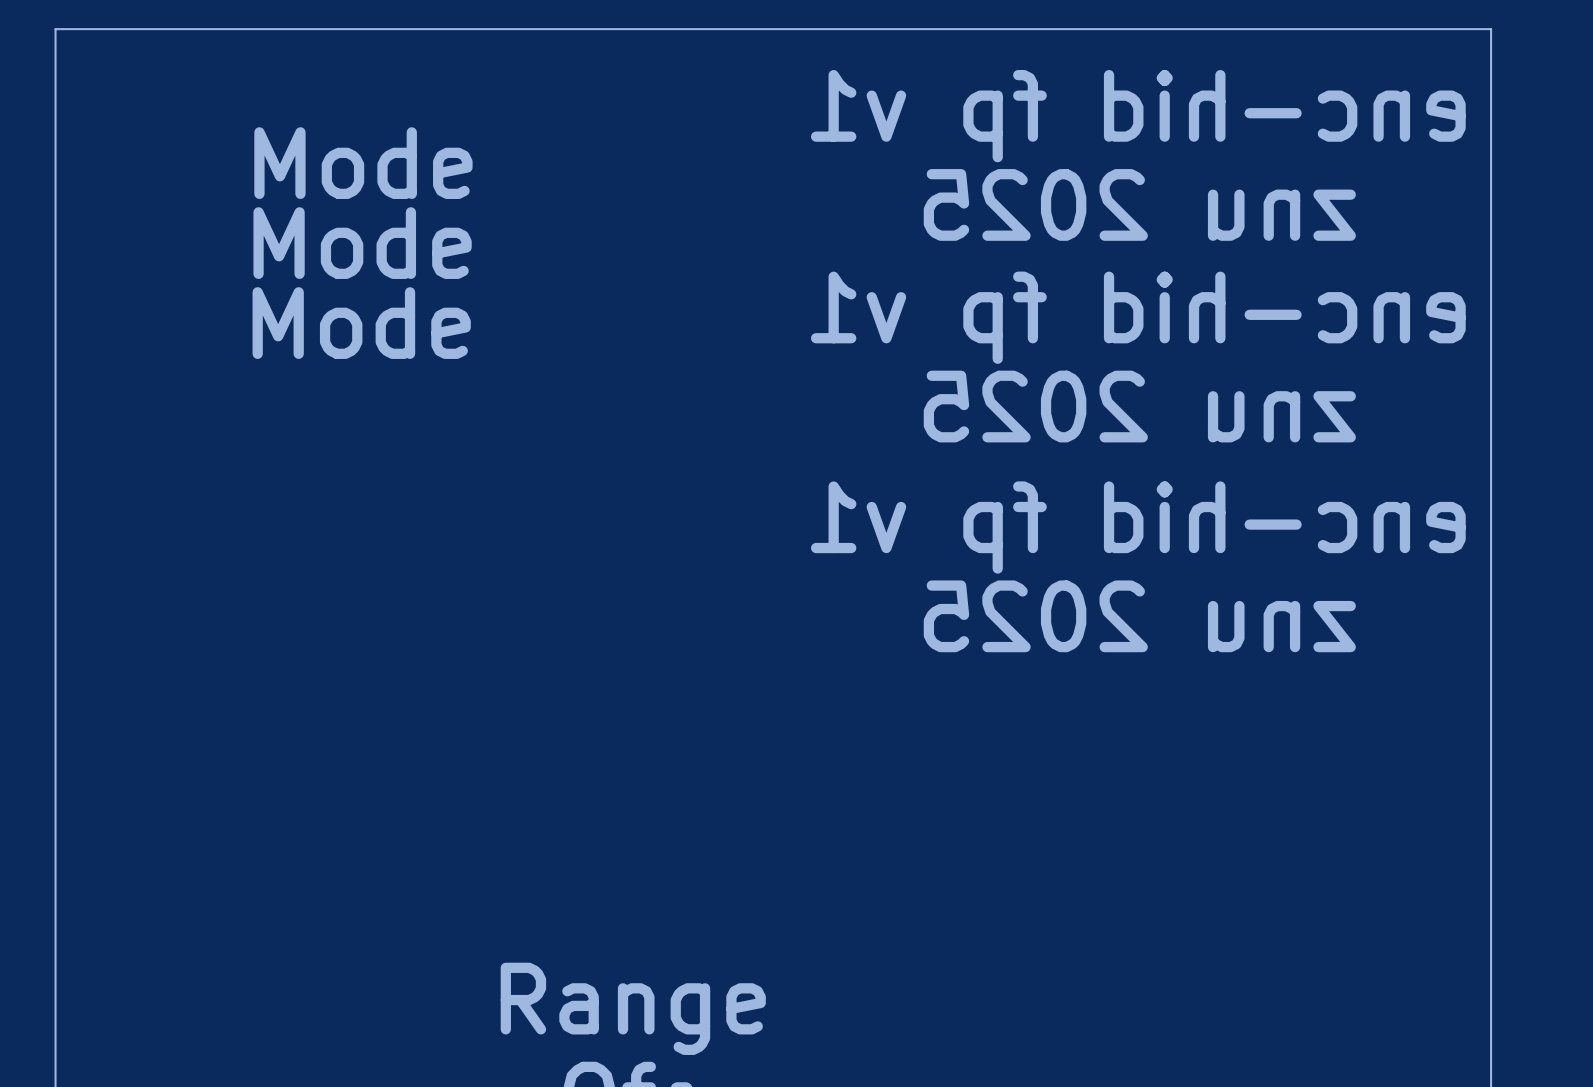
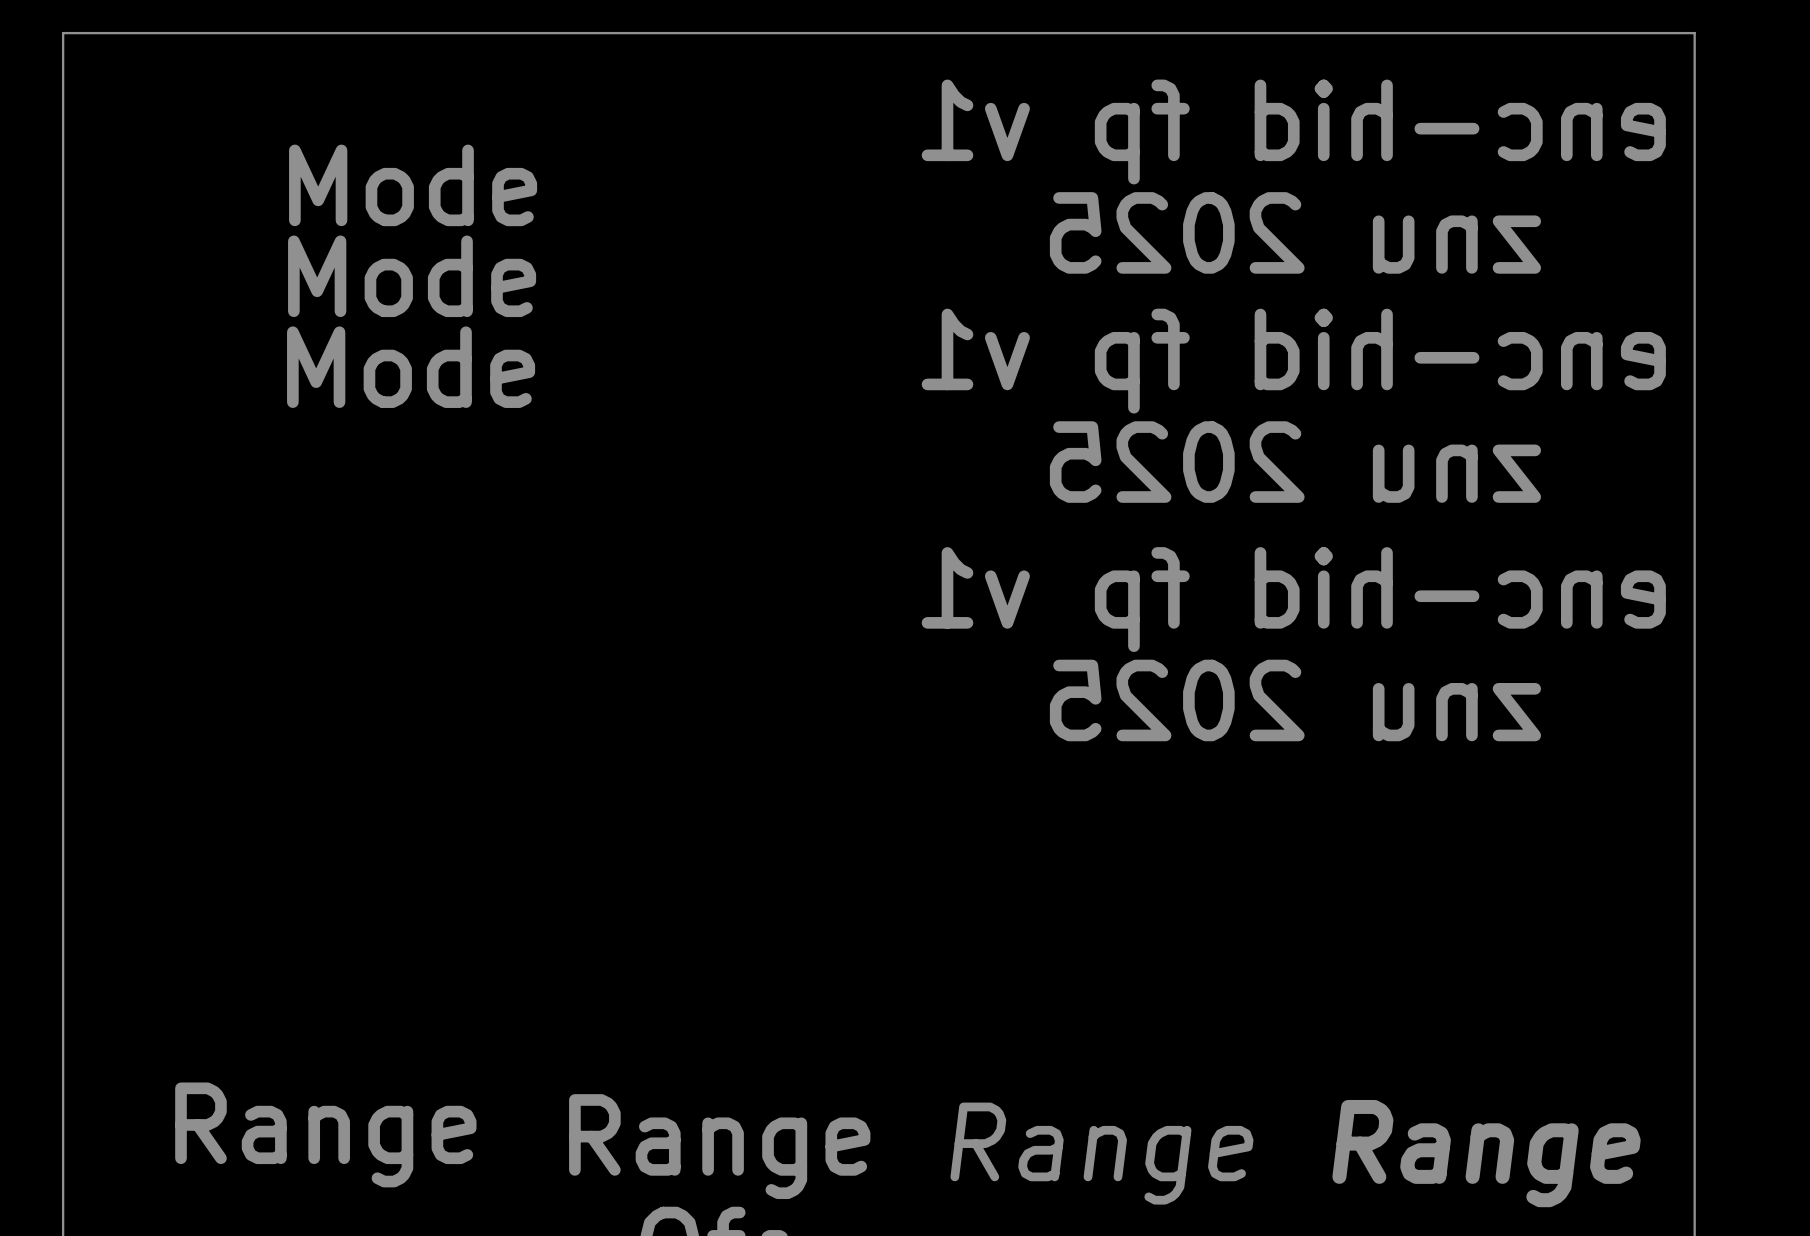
text: none -> Range (325, 1134)
text: none -> Range (1101, 1153)
text: none -> Range (1486, 1153)

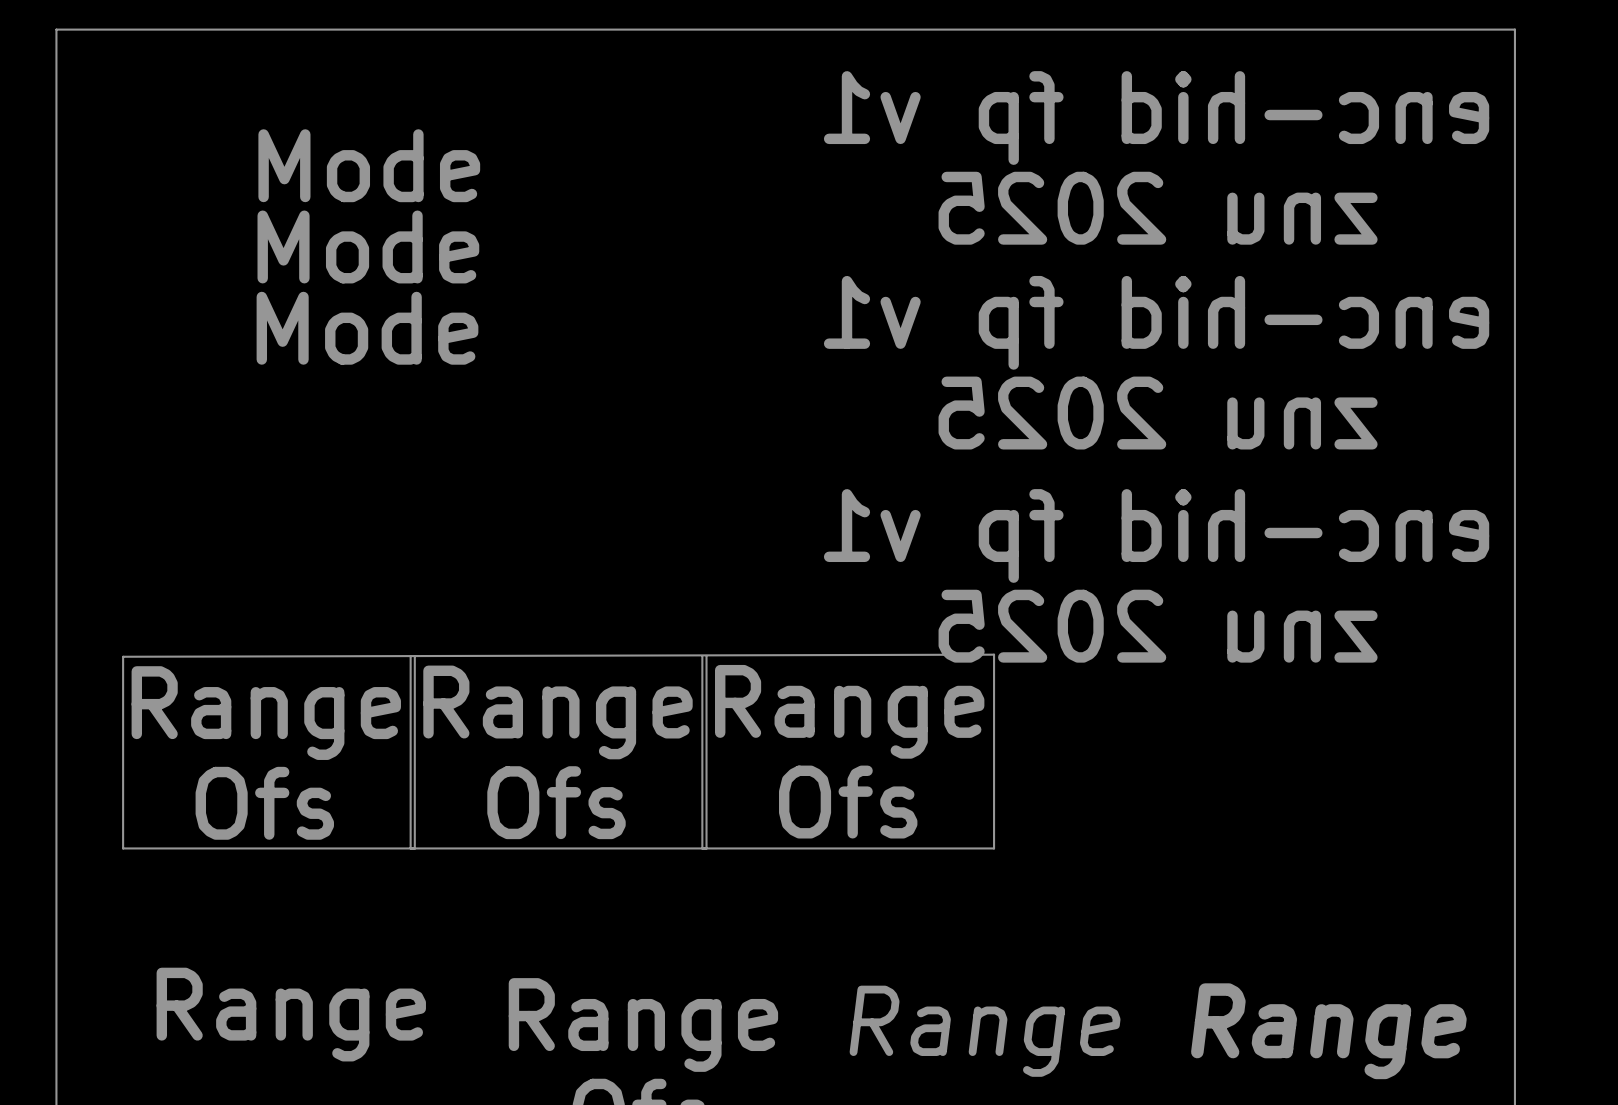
line: none -> (994, 654) (123, 656) (123, 848) (994, 848) (994, 654)
line: none -> (410, 656) (410, 848)
line: none -> (414, 656) (414, 848)
line: none -> (702, 656) (702, 848)
line: none -> (706, 656) (706, 848)
text: none -> Range (557, 712)
text: none -> Range (849, 711)
text: none -> Range (266, 713)
text: none -> Ofs (556, 802)
text: none -> Ofs (848, 802)
text: none -> Ofs (264, 803)

